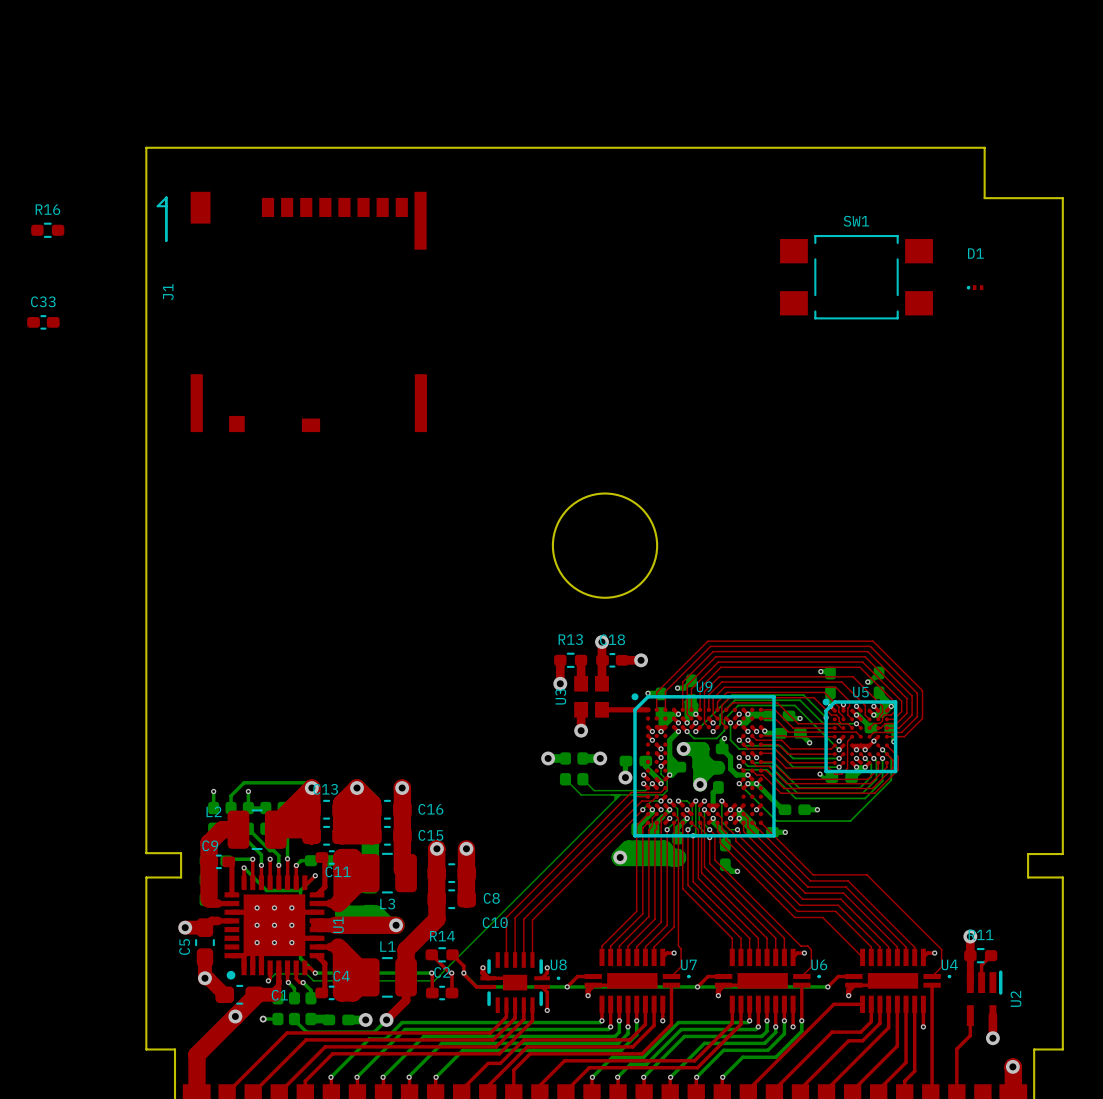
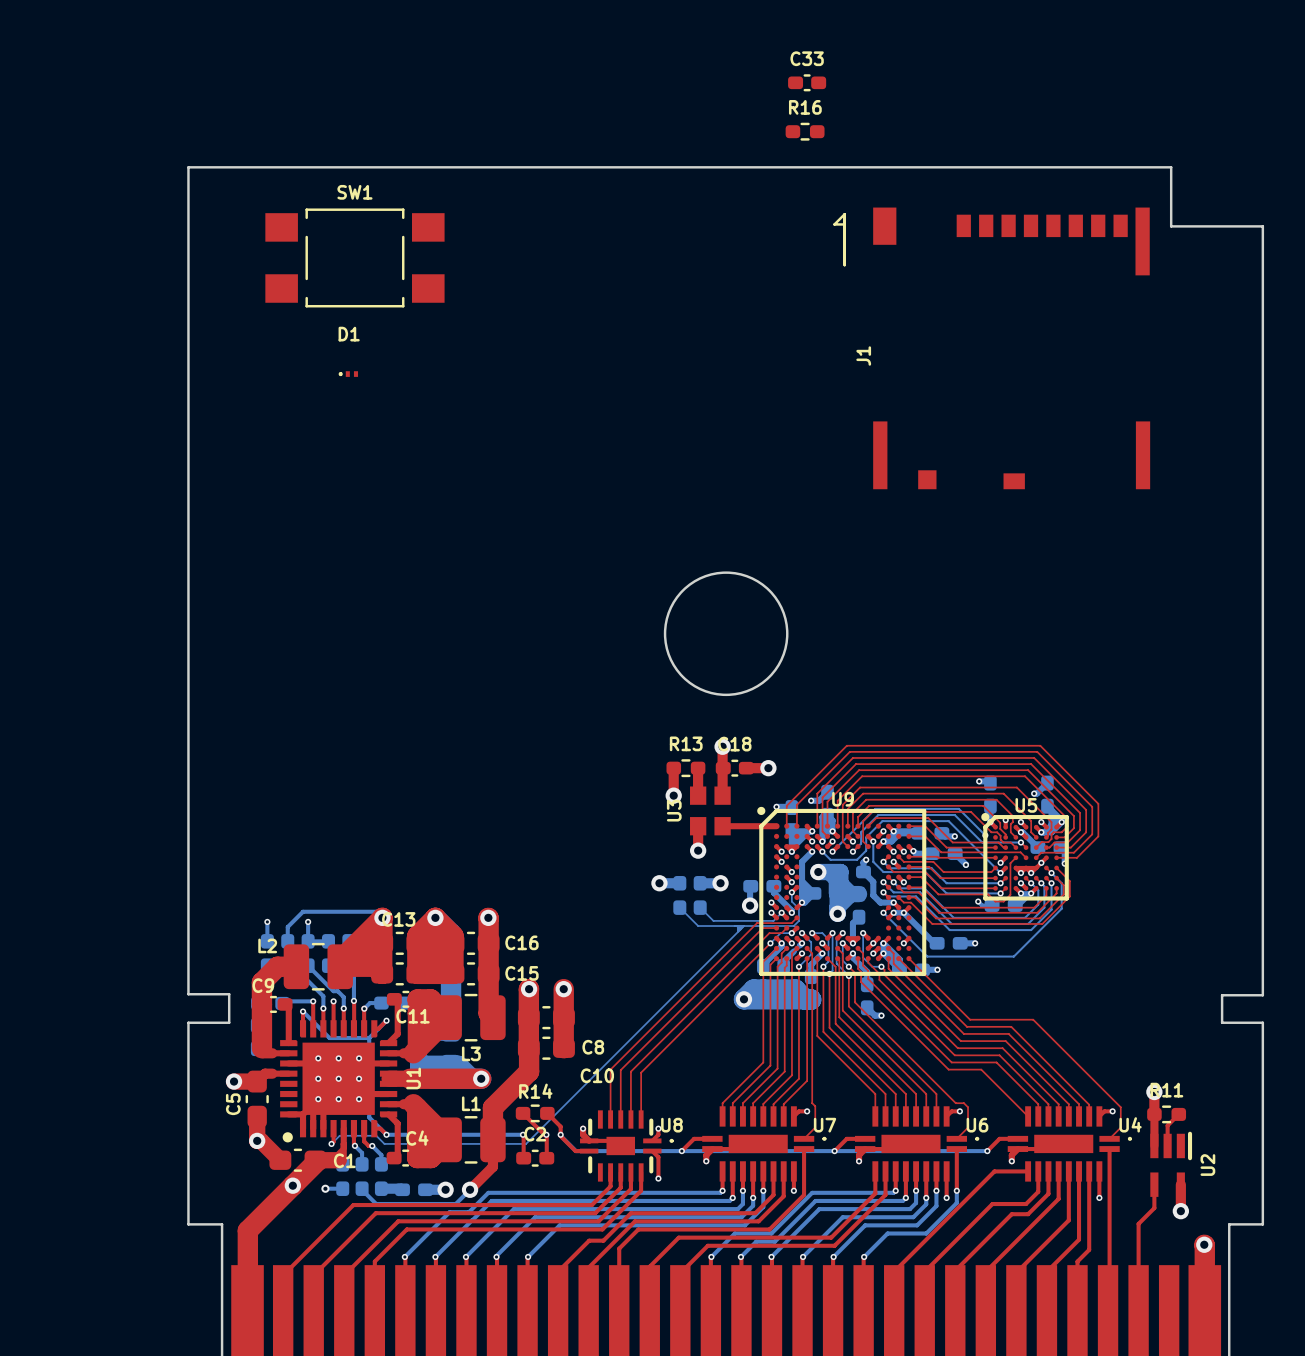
R16 position: (47, 230) -> (805, 131)
SW1 position: (856, 277) -> (354, 257)
D1 position: (975, 287) -> (348, 374)
J1 name position: J1 (168, 292) -> J1 (863, 356)
J1 position: (291, 311) -> (991, 348)
C33 position: (43, 322) -> (807, 82)

